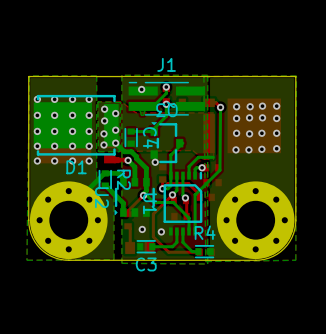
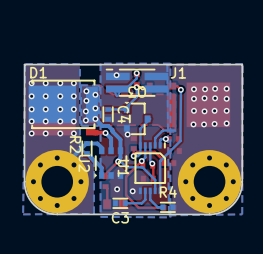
J1 name position: J1 (166, 64) -> J1 (178, 72)
D1 name position: D1 (76, 167) -> D1 (38, 72)
R2 name position: R2 (123, 179) -> R2 (75, 144)

